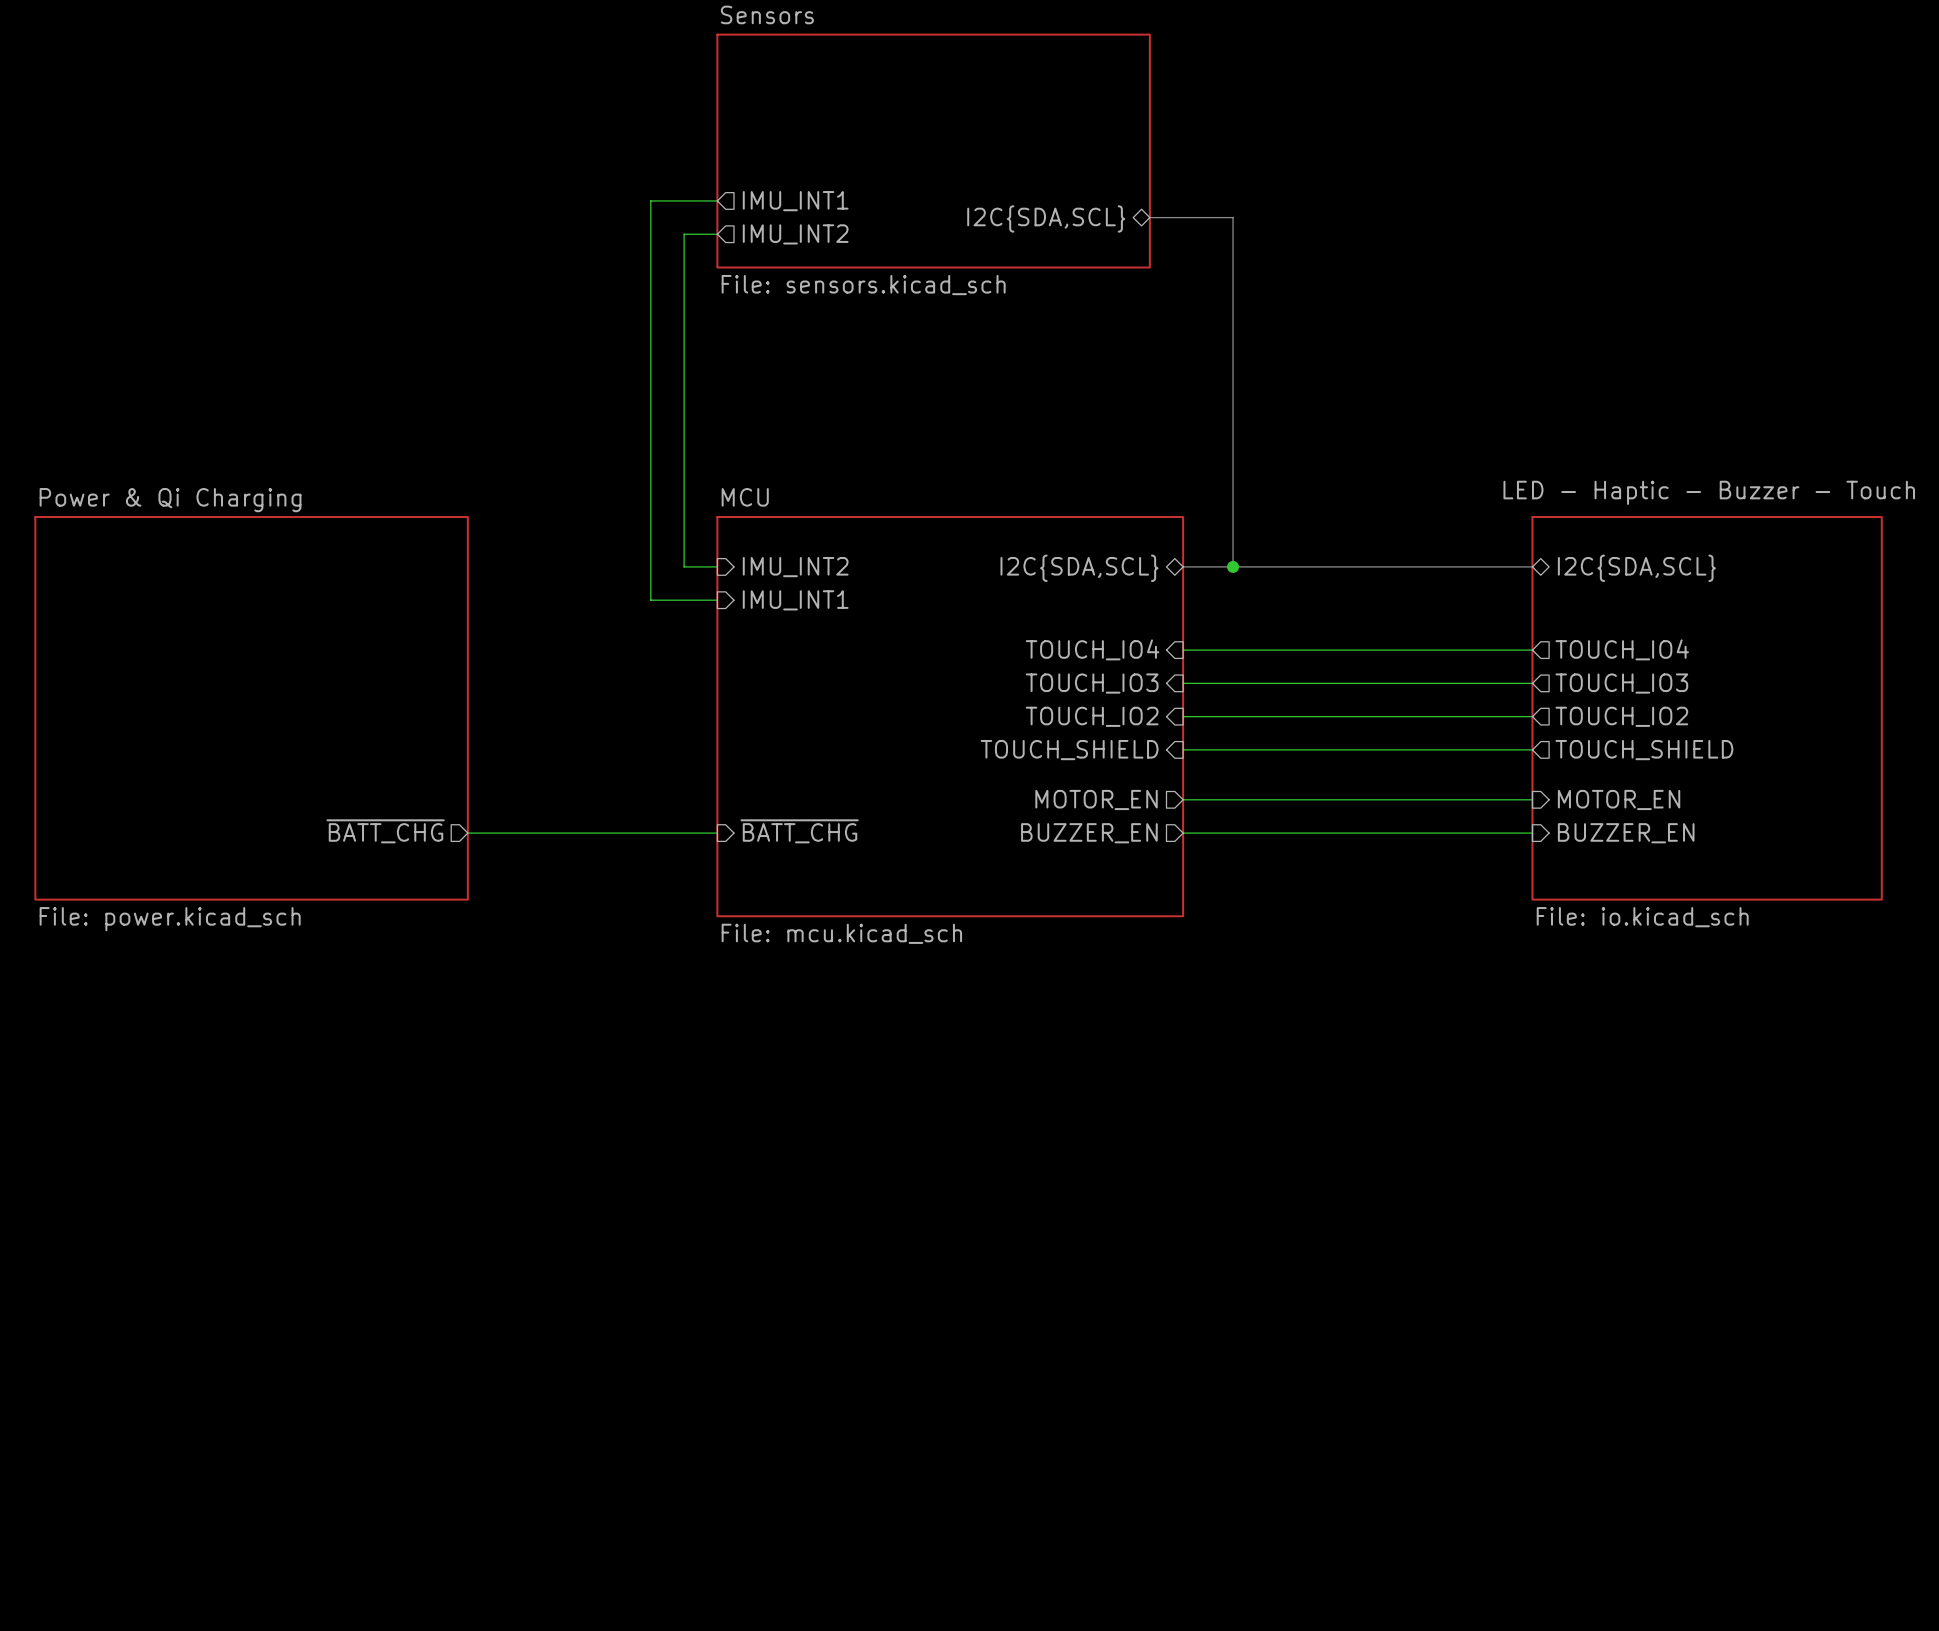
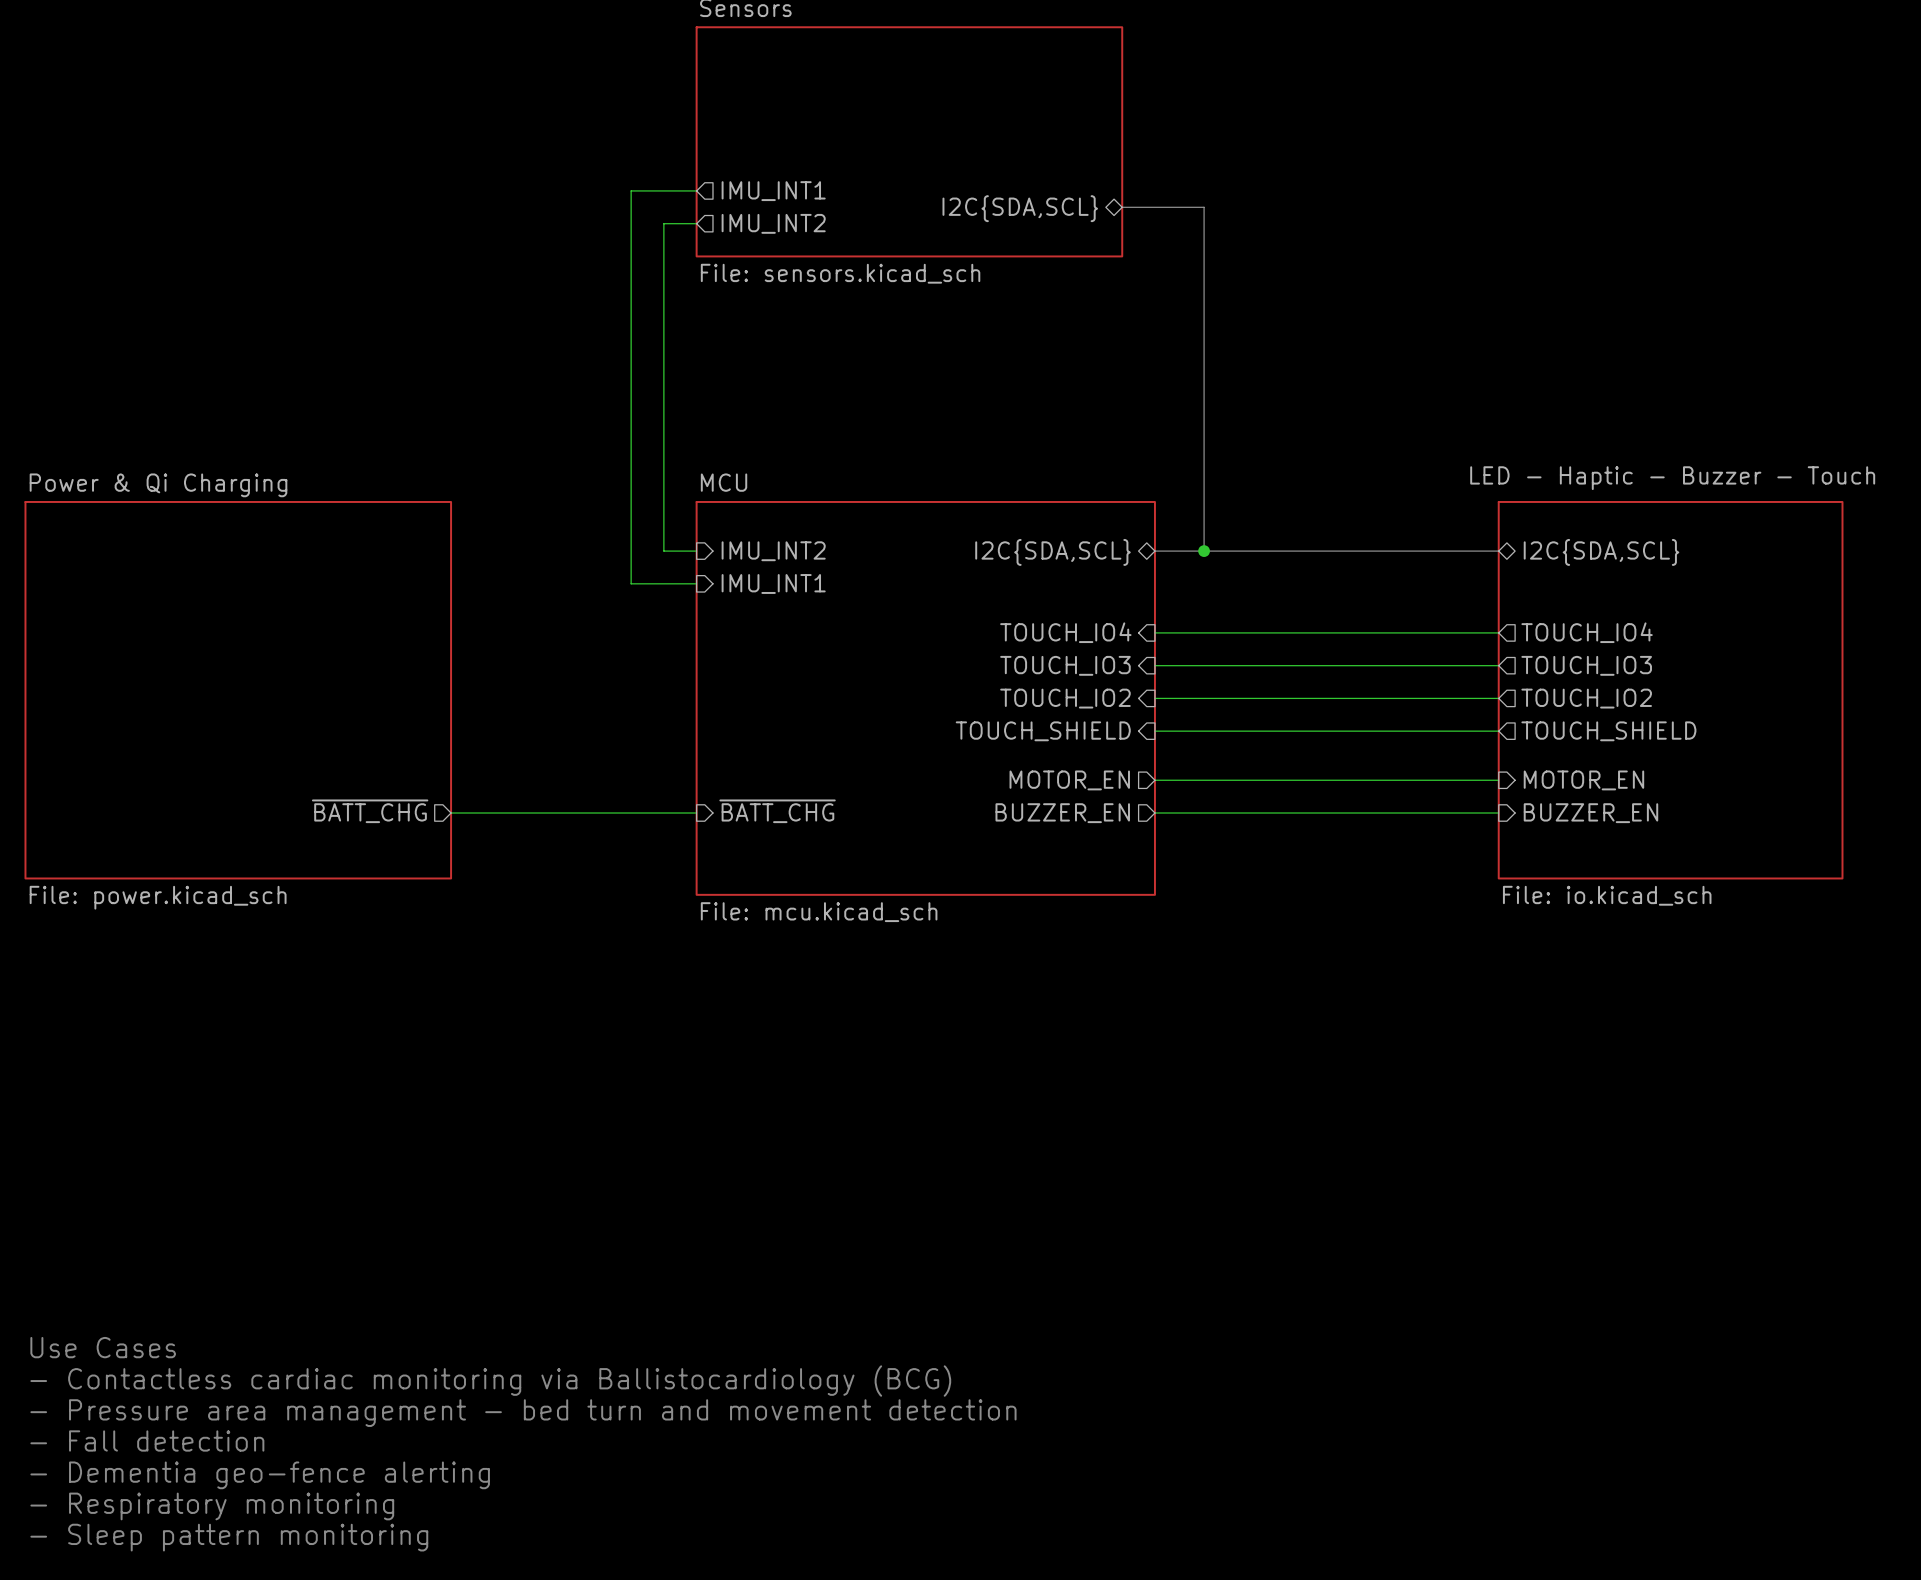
text: none -> Use Cases (103, 1347)
text: none -> - Contactless cardiac monitoring via Ballistocardiology (BCG) (490, 1381)
text: none -> - Pressure area management - bed turn and movement detection (523, 1413)
text: none -> - Fall detection (147, 1440)
text: none -> - Dementia geo-fence alerting (260, 1475)
text: none -> - Respiratory monitoring (212, 1506)
text: none -> - Sleep pattern monitoring (229, 1537)

